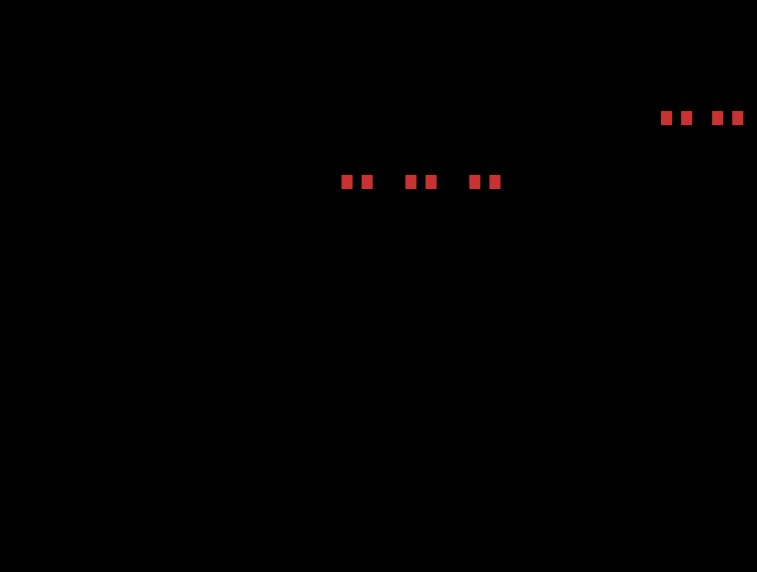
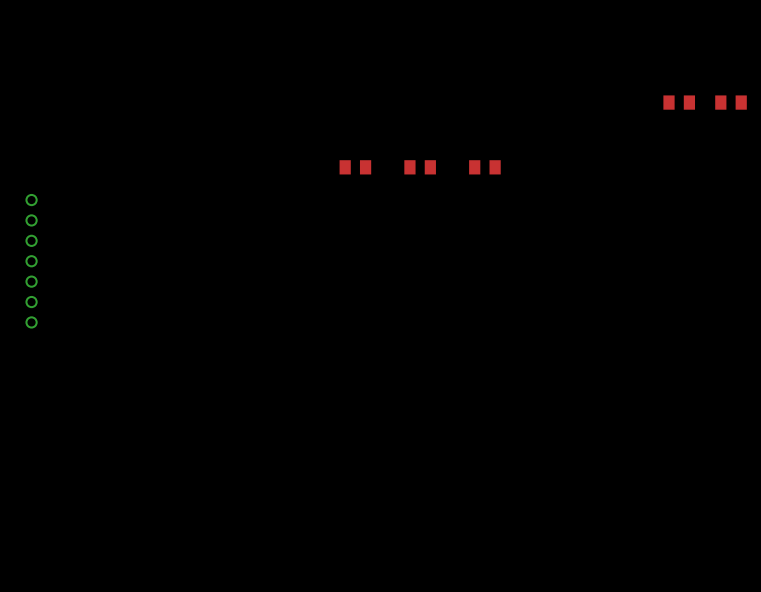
part: none -> (31, 261)

